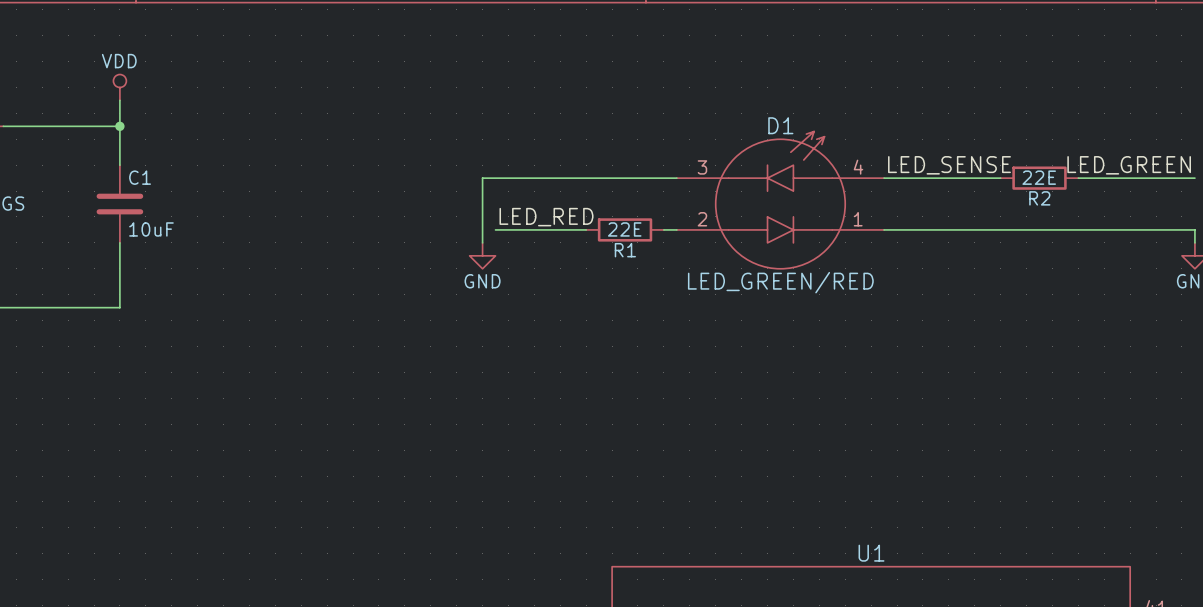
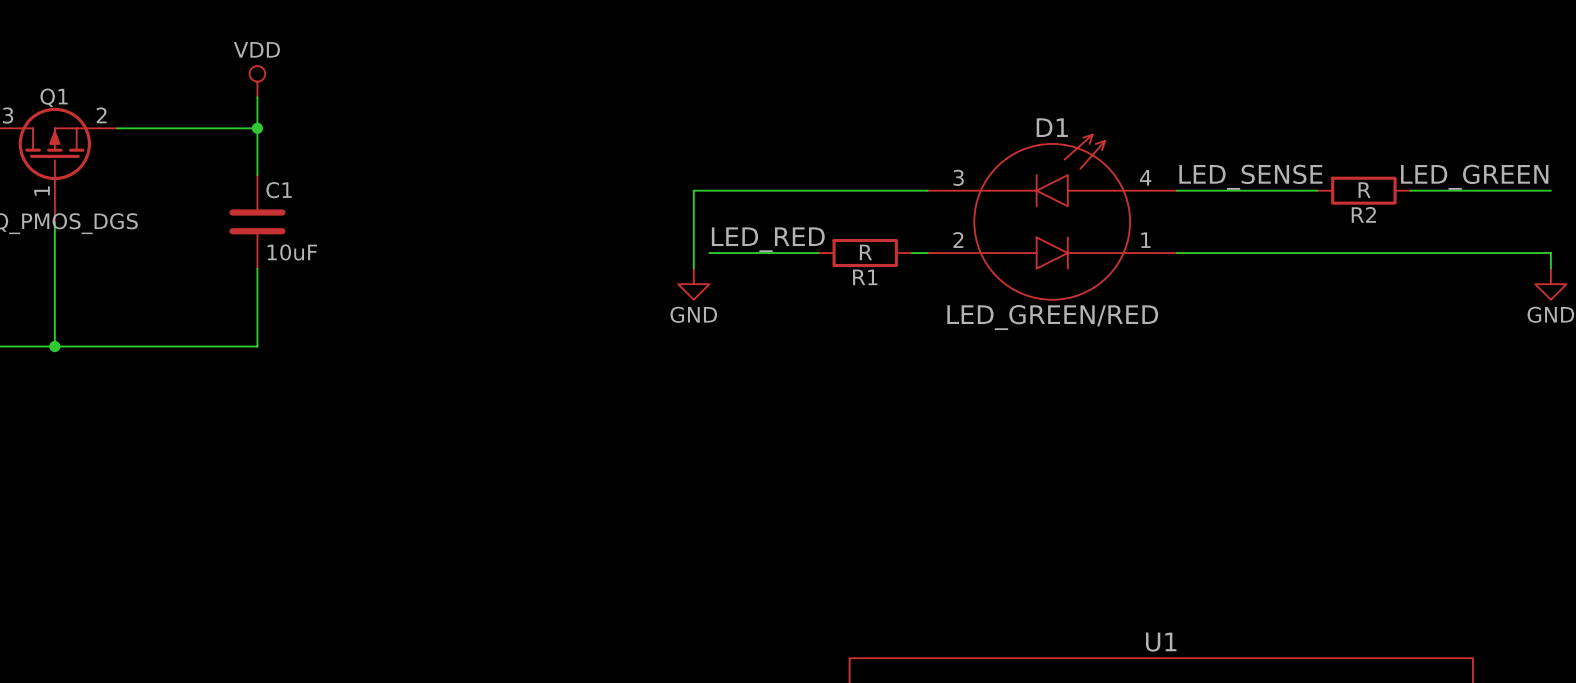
R2 value: 22E (1039, 177) -> R (1364, 190)
R1 value: 22E (624, 229) -> R (865, 252)

